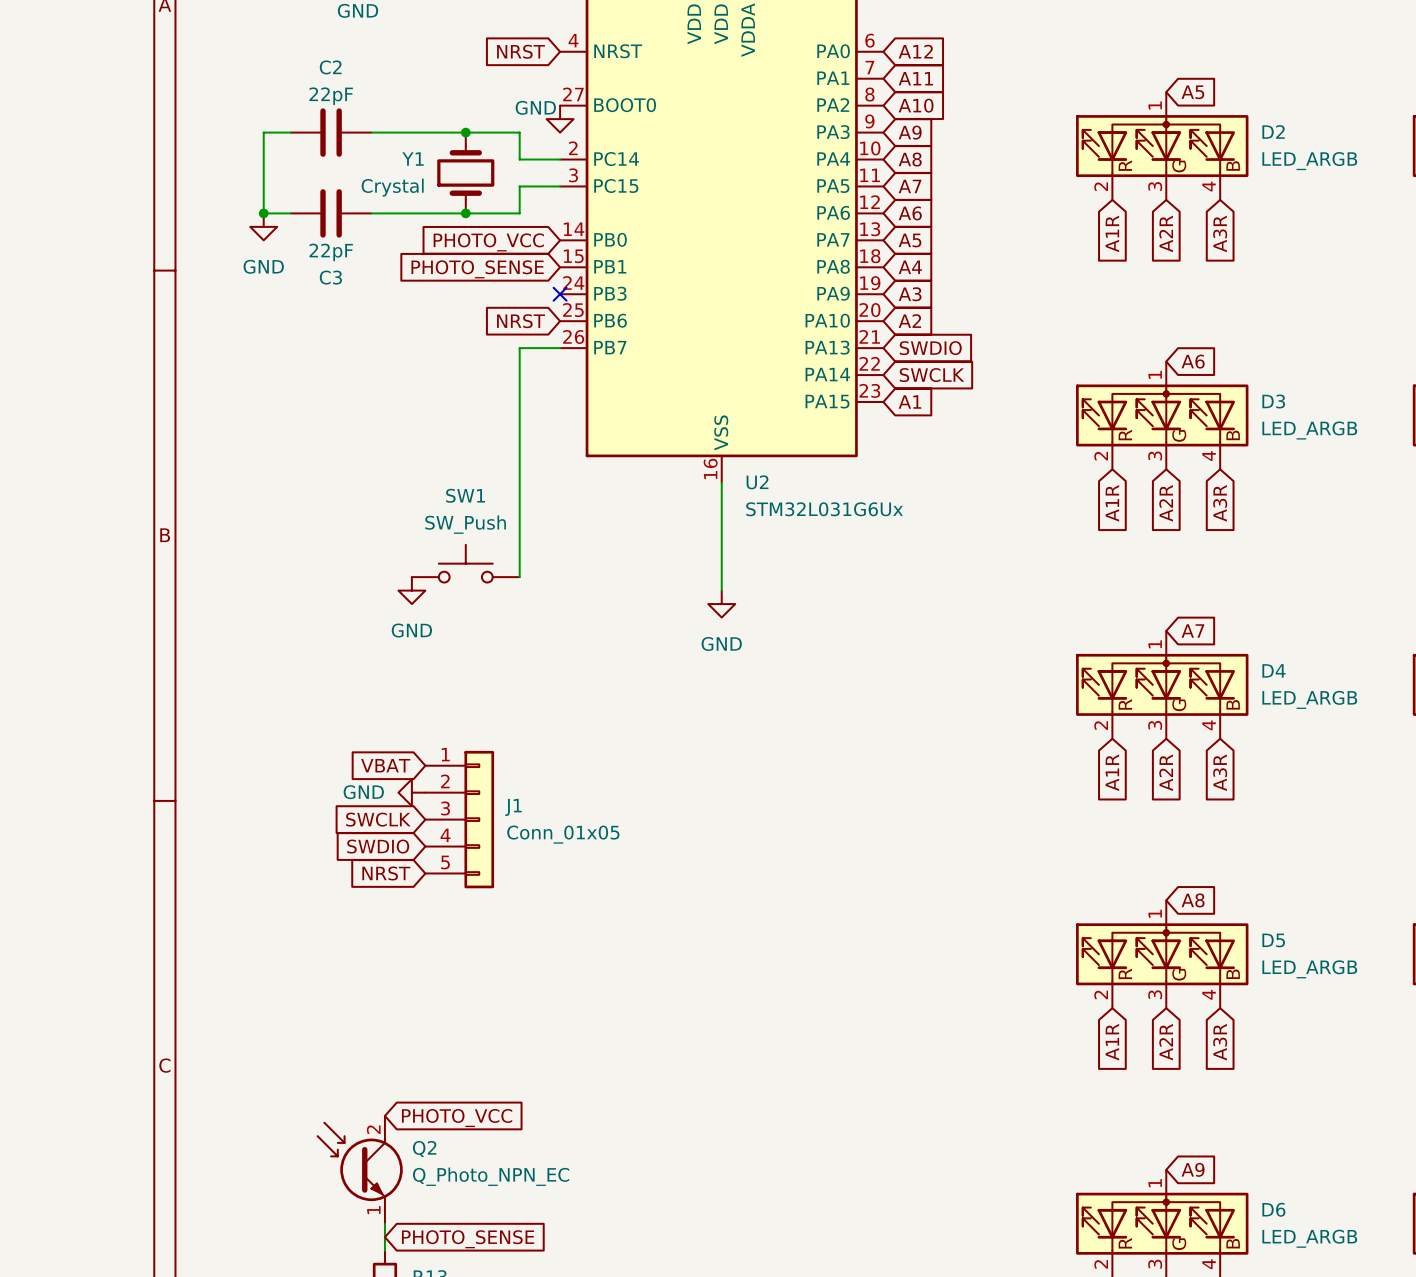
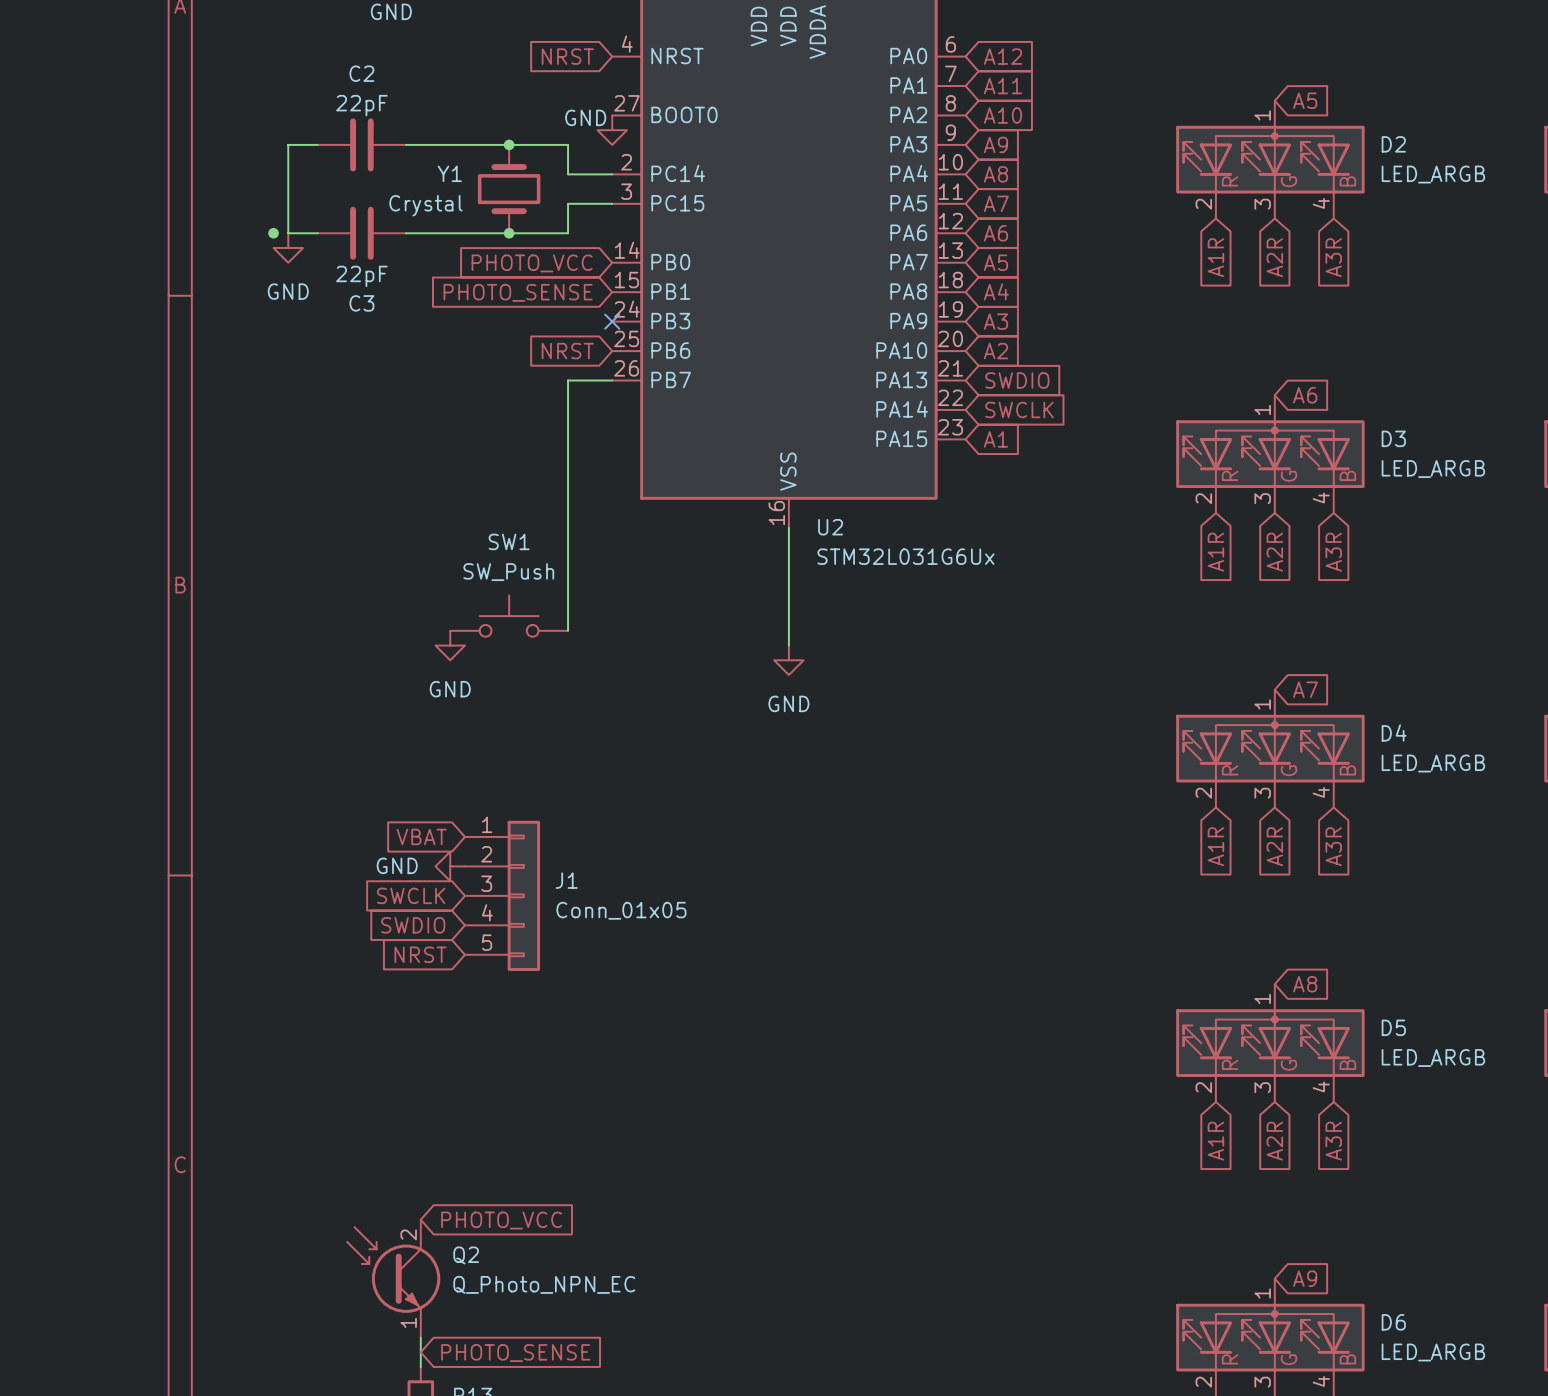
junction position: (263, 213) -> (273, 233)

